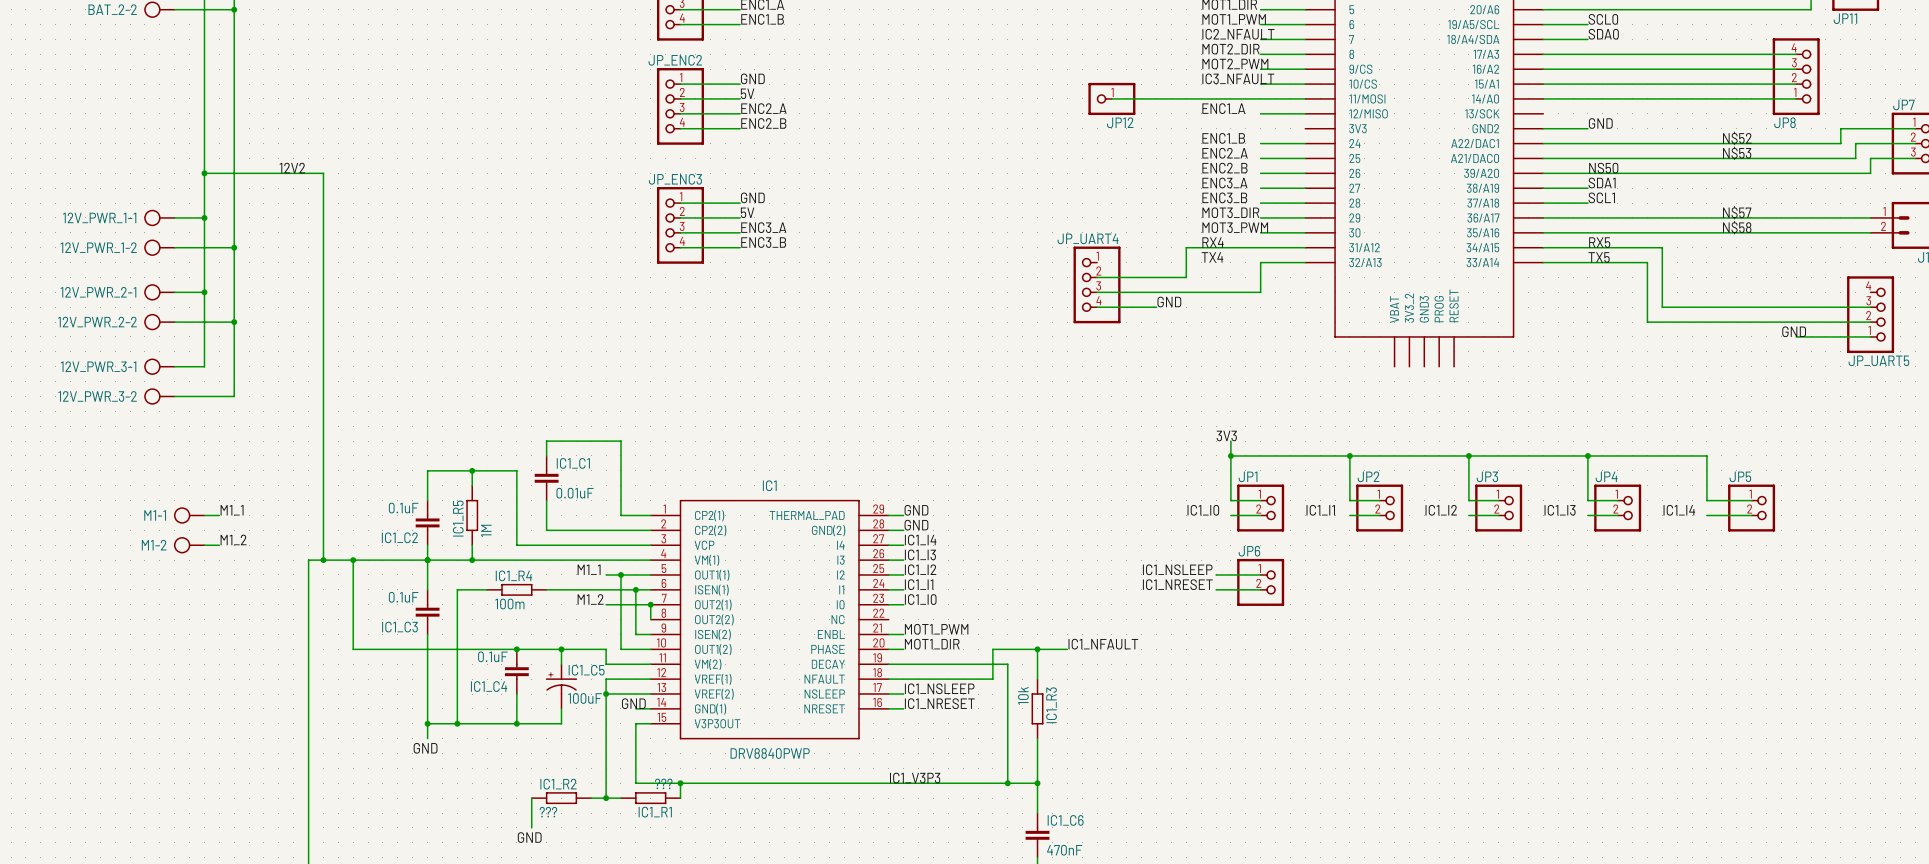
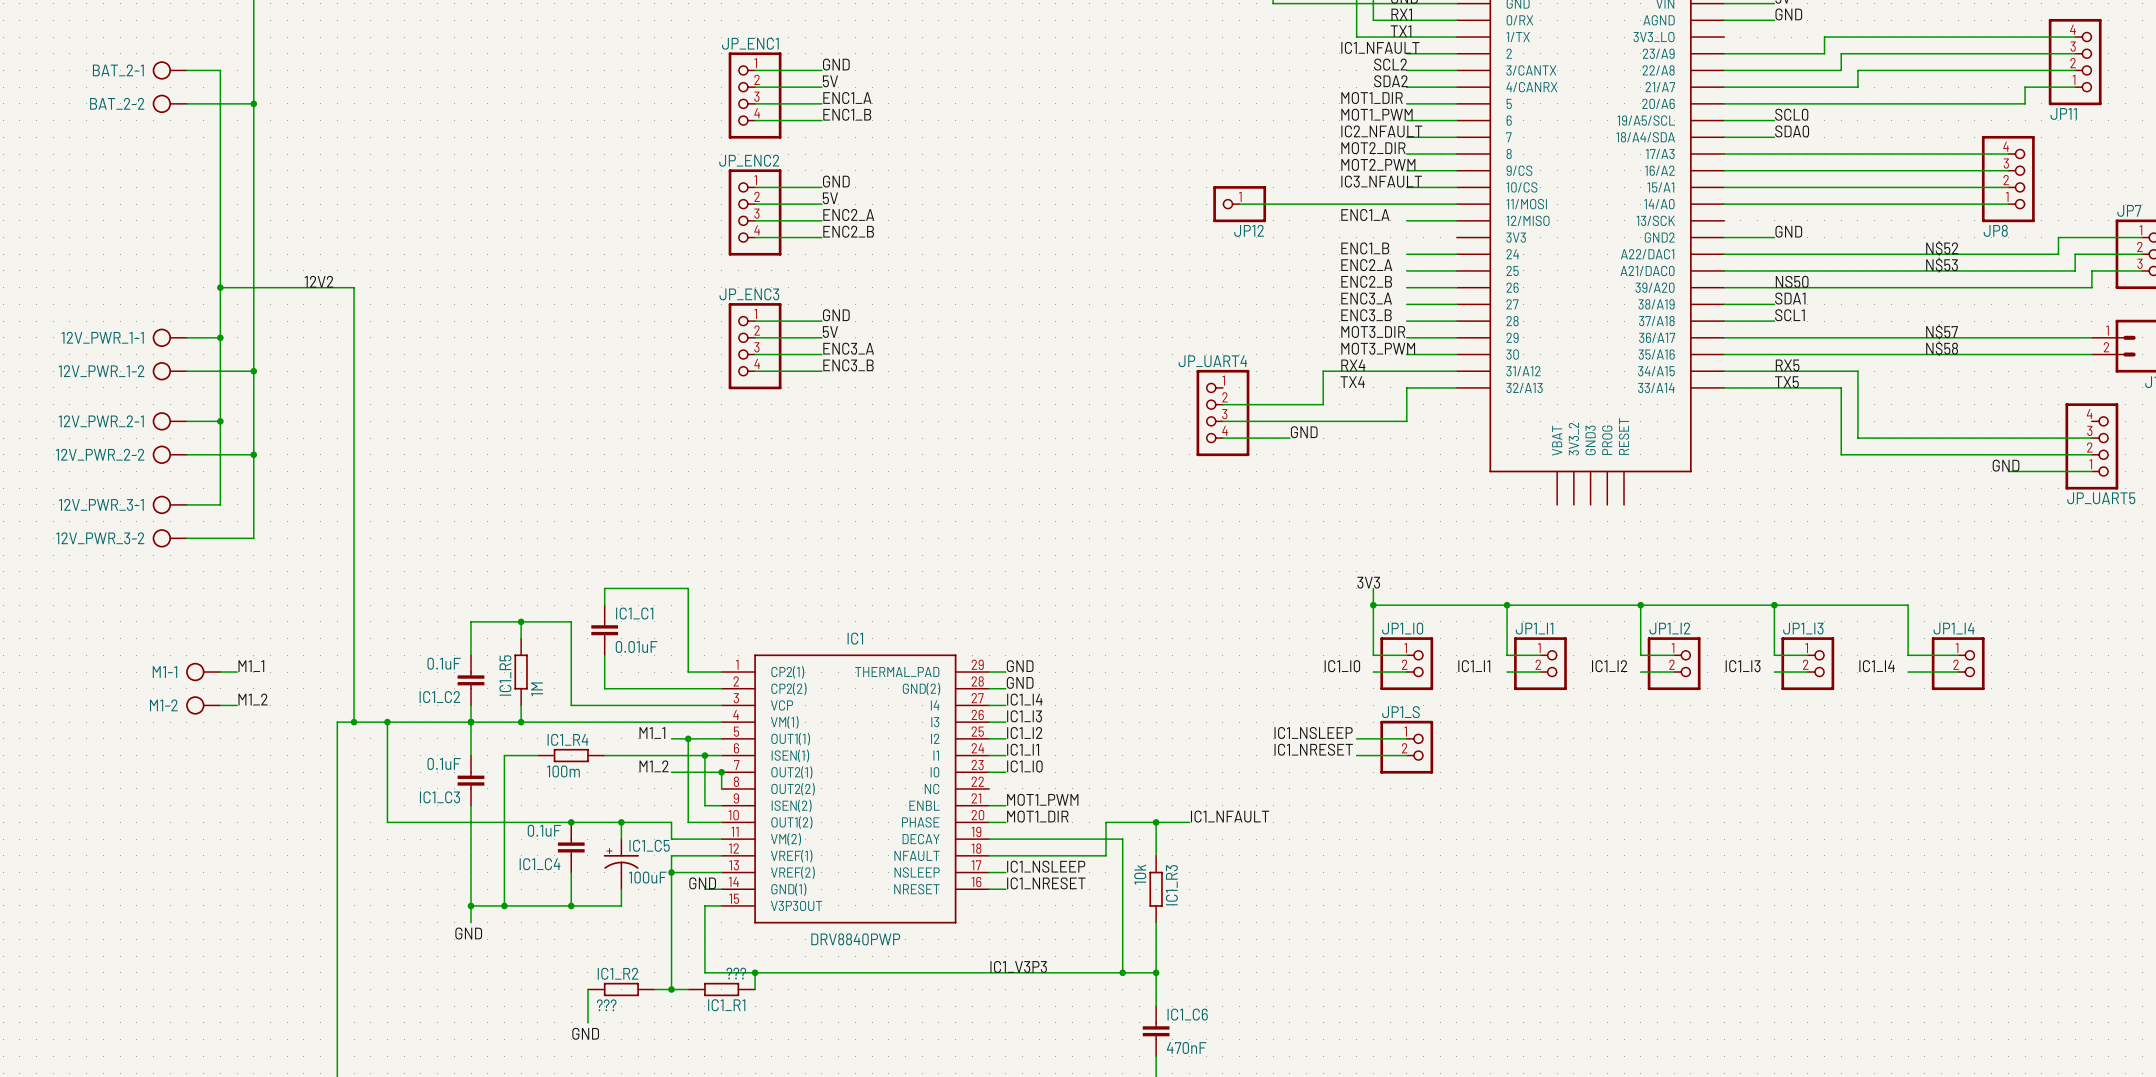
JP1 name: JP1 (1248, 476) -> JP1_I0 (1402, 628)
JP2 name: JP2 (1368, 476) -> JP1_I1 (1534, 628)
JP3 name: JP3 (1487, 476) -> JP1_I2 (1669, 628)
JP4 name: JP4 (1606, 476) -> JP1_I3 (1803, 628)
JP5 name: JP5 (1740, 476) -> JP1_I4 (1954, 628)
JP6 name: JP6 (1249, 551) -> JP1_S (1400, 712)

